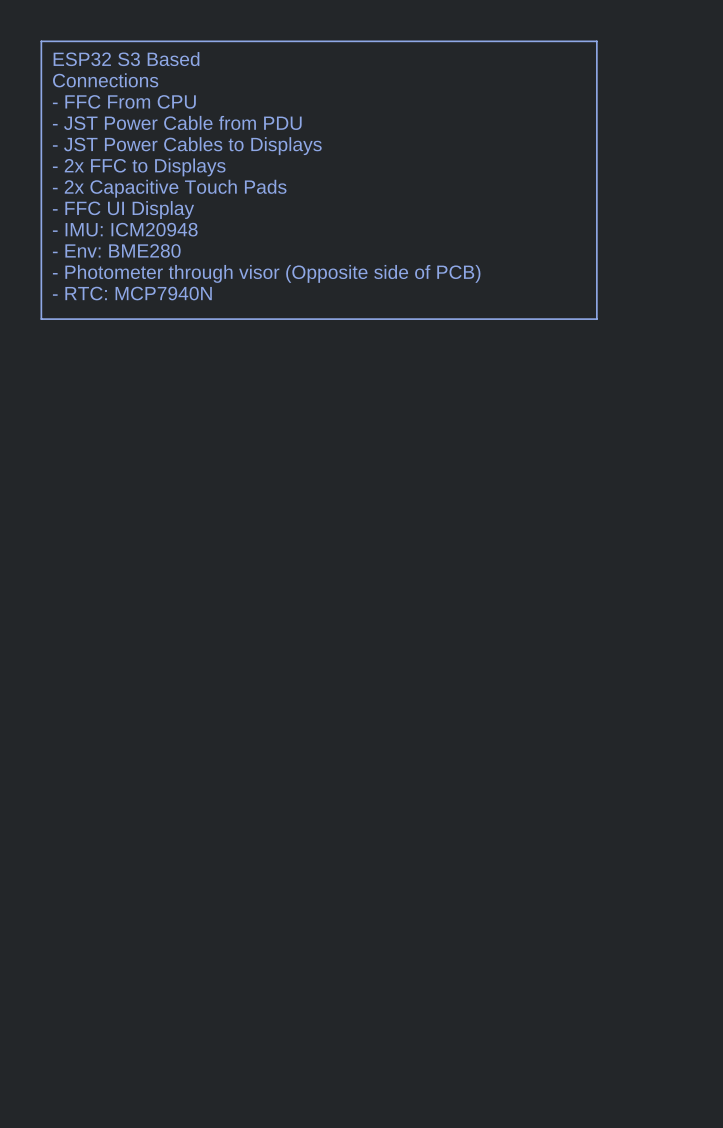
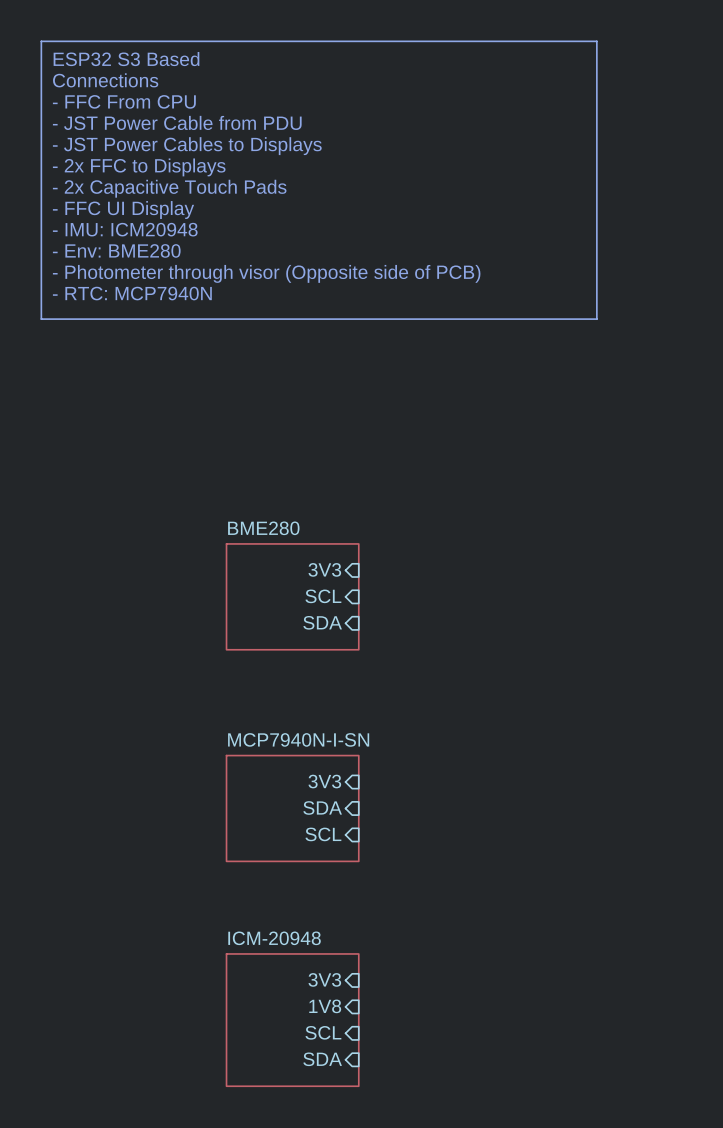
sheet pin: none -> 3V3 (324, 569)
sheet BME280: none -> (292, 596)
sheet pin: none -> SCL (323, 596)
sheet pin: none -> SDA (322, 622)
sheet pin: none -> 3V3 (324, 781)
sheet pin: none -> SDA (322, 807)
sheet MCP7940N-I-SN: none -> (292, 808)
sheet pin: none -> SCL (323, 834)
sheet pin: none -> 3V3 (324, 979)
sheet pin: none -> 1V8 (325, 1006)
sheet ICM-20948: none -> (292, 1020)
sheet pin: none -> SCL (323, 1032)
sheet pin: none -> SDA (322, 1059)

